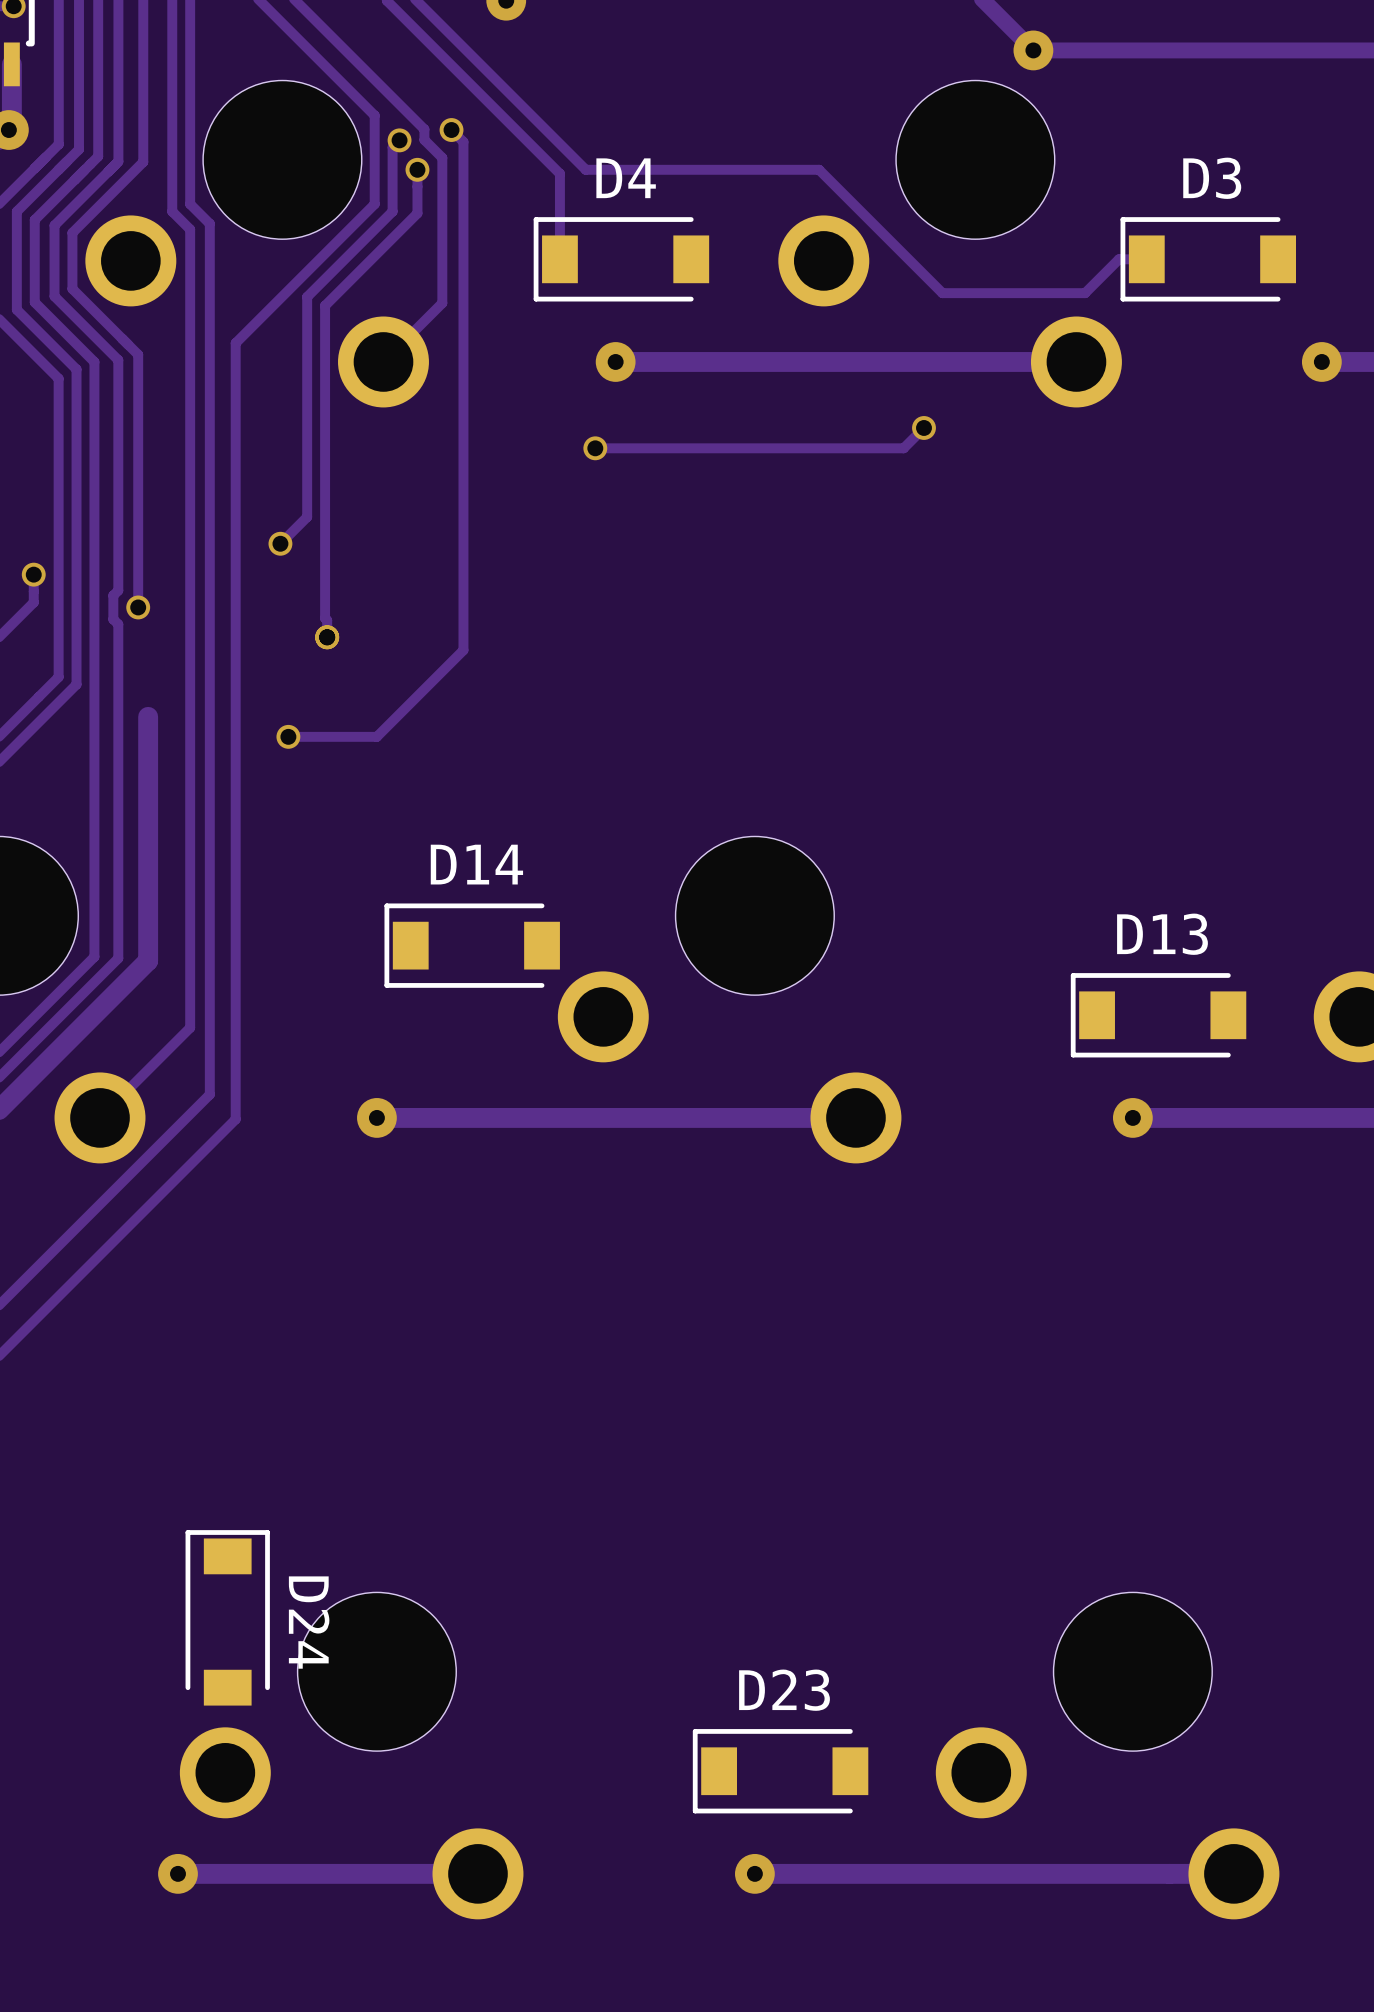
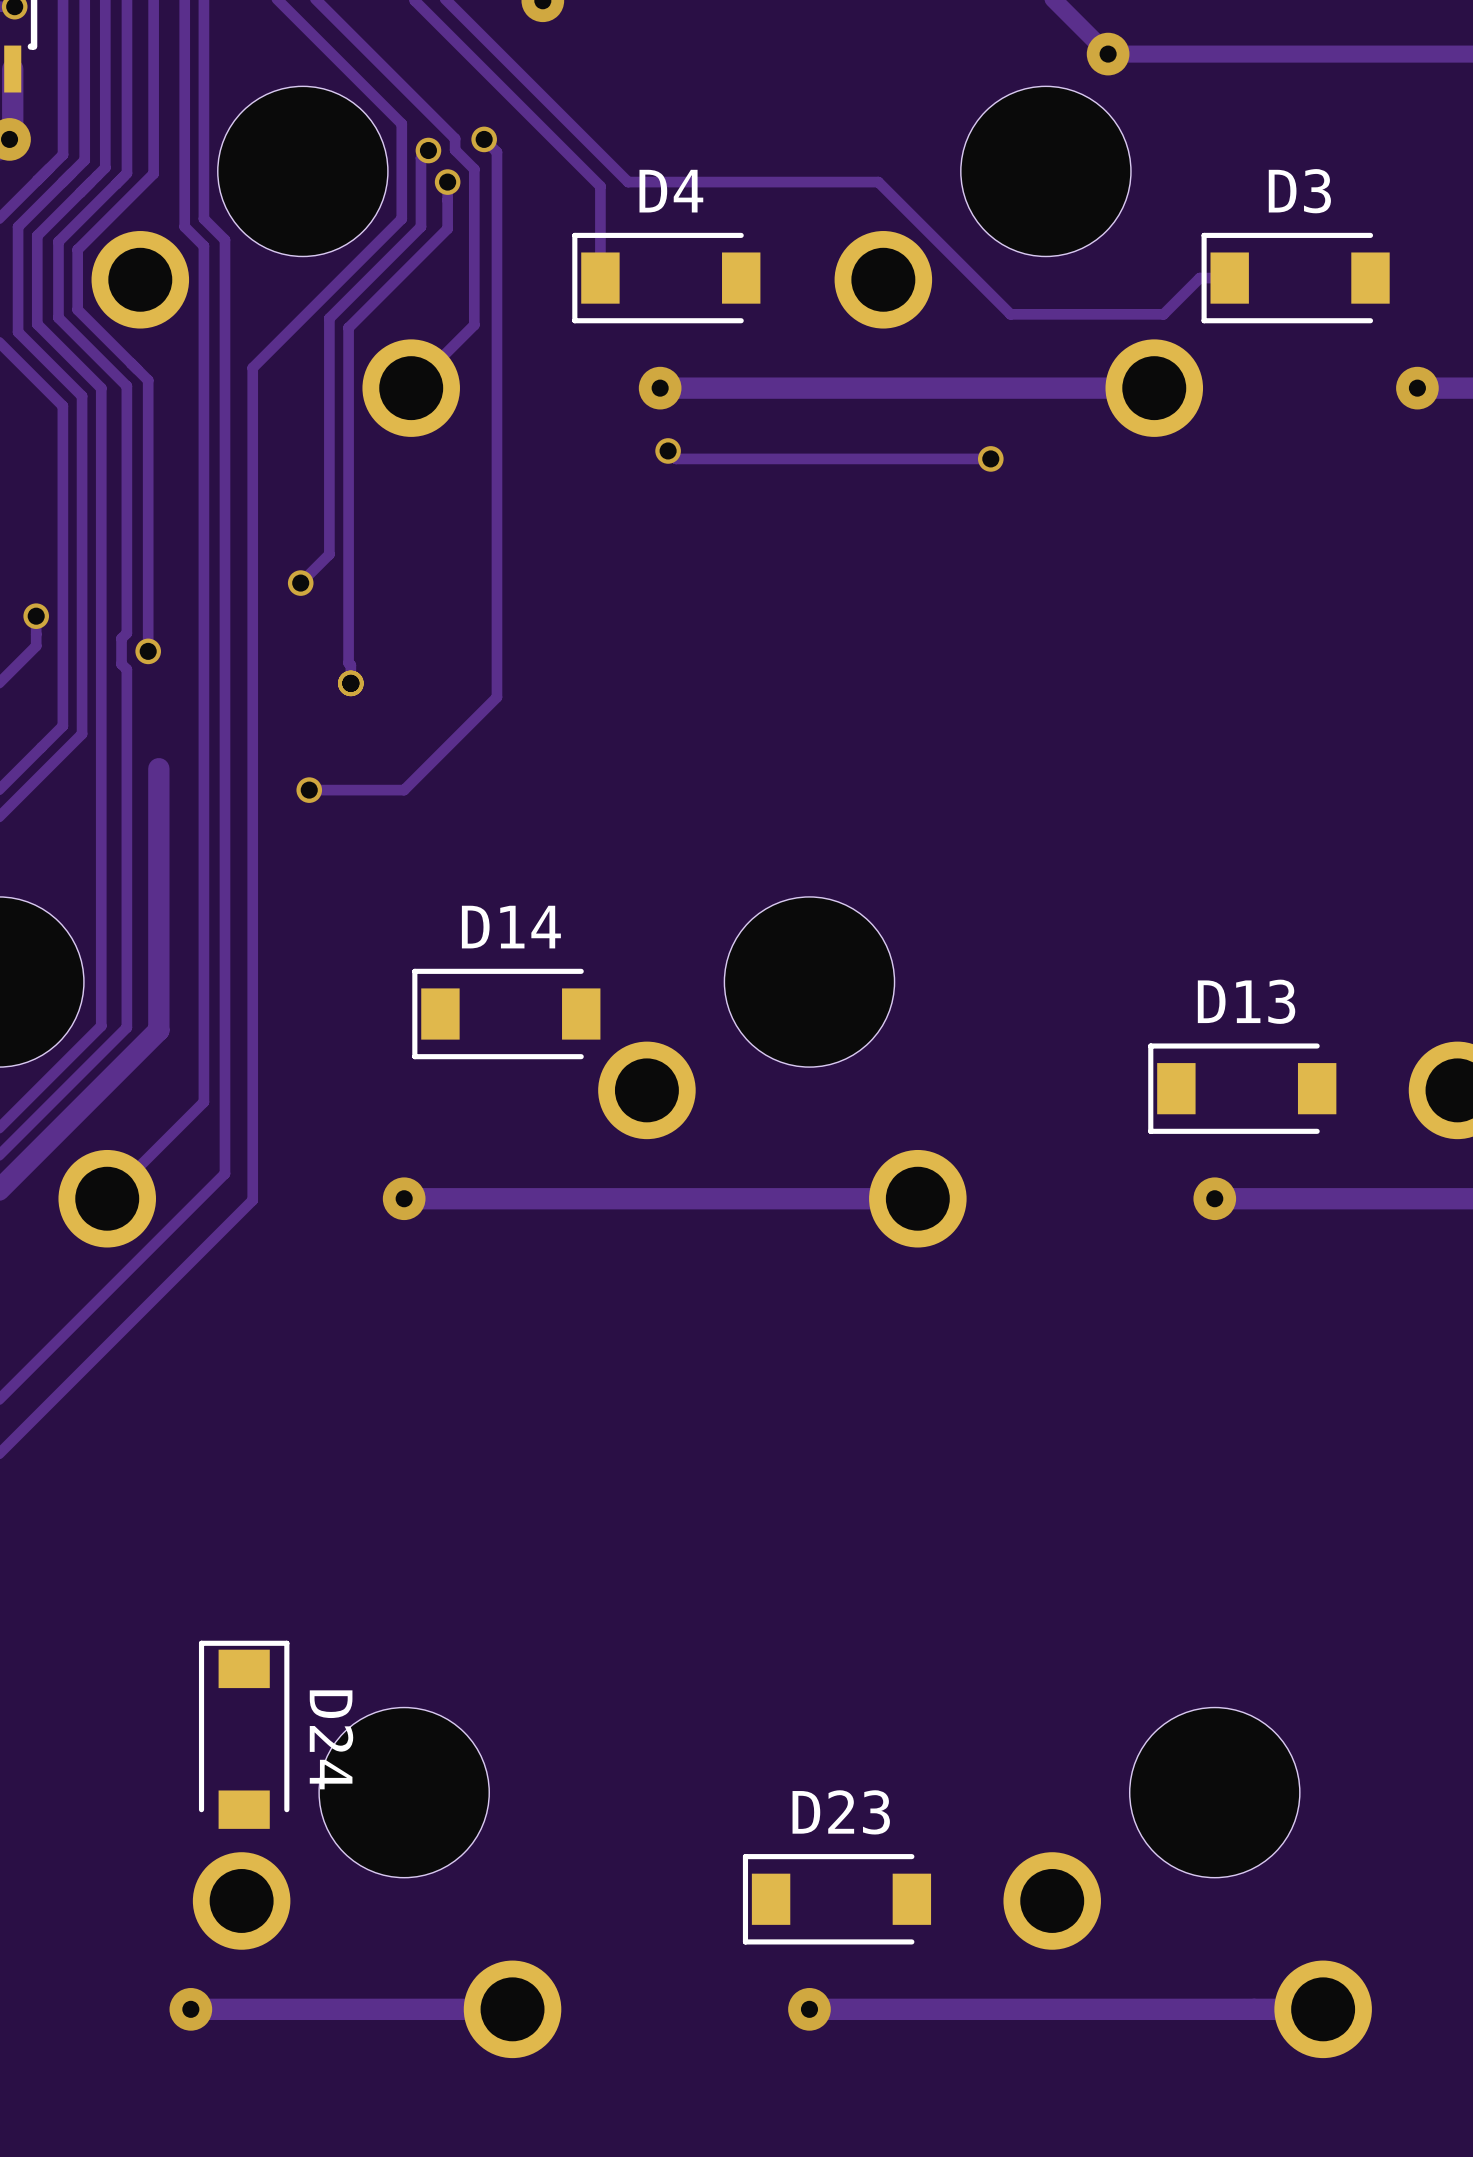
track: (923, 427) (903, 448) (595, 448) -> (990, 458) (676, 458) (668, 450)
via position: (595, 448) -> (668, 450)

